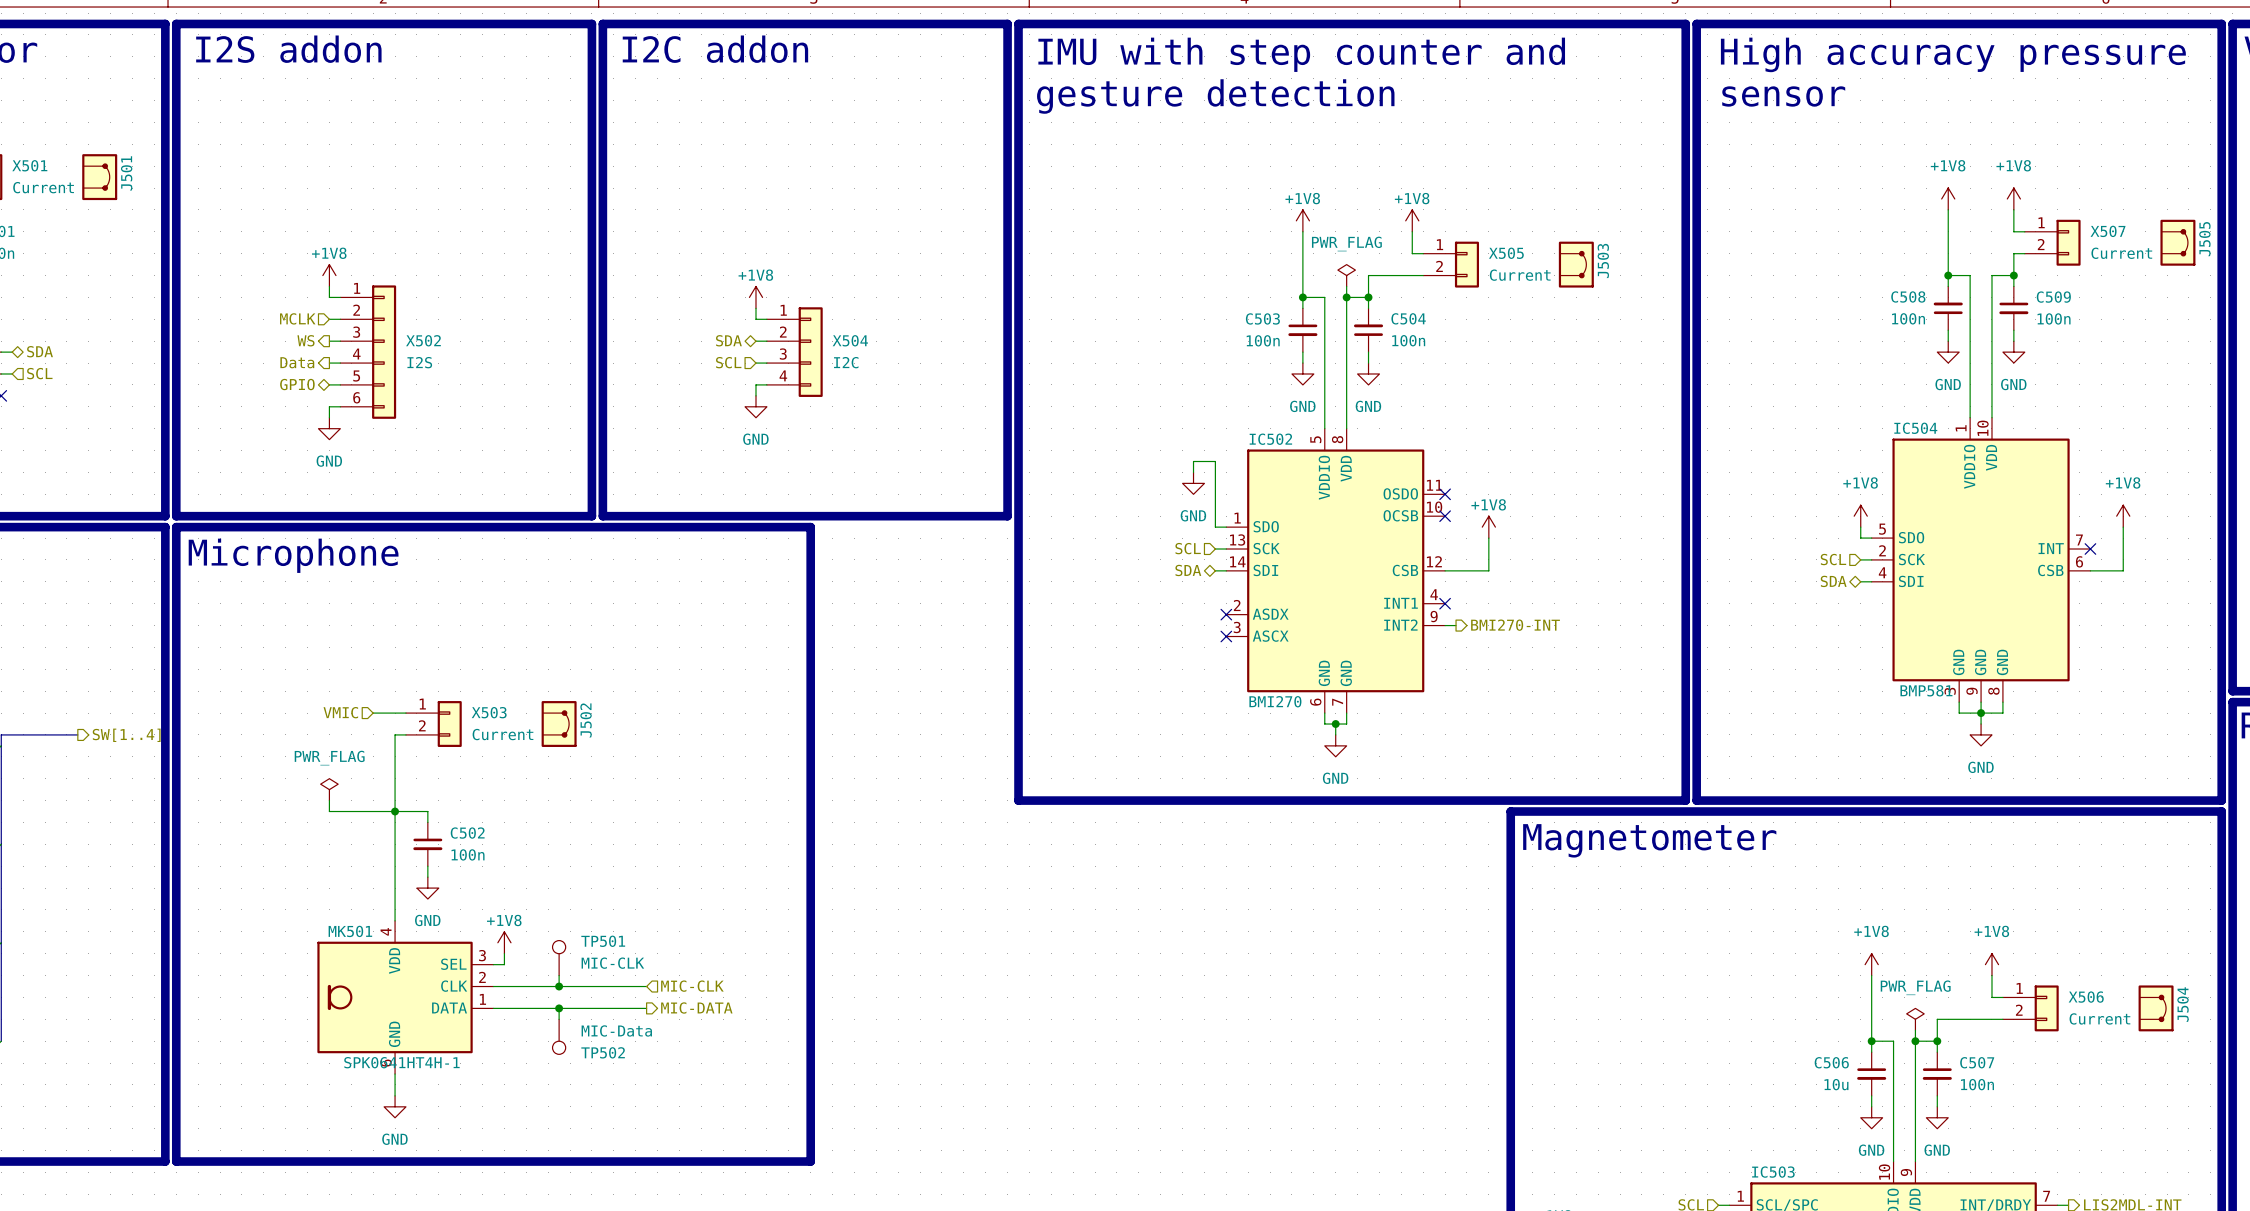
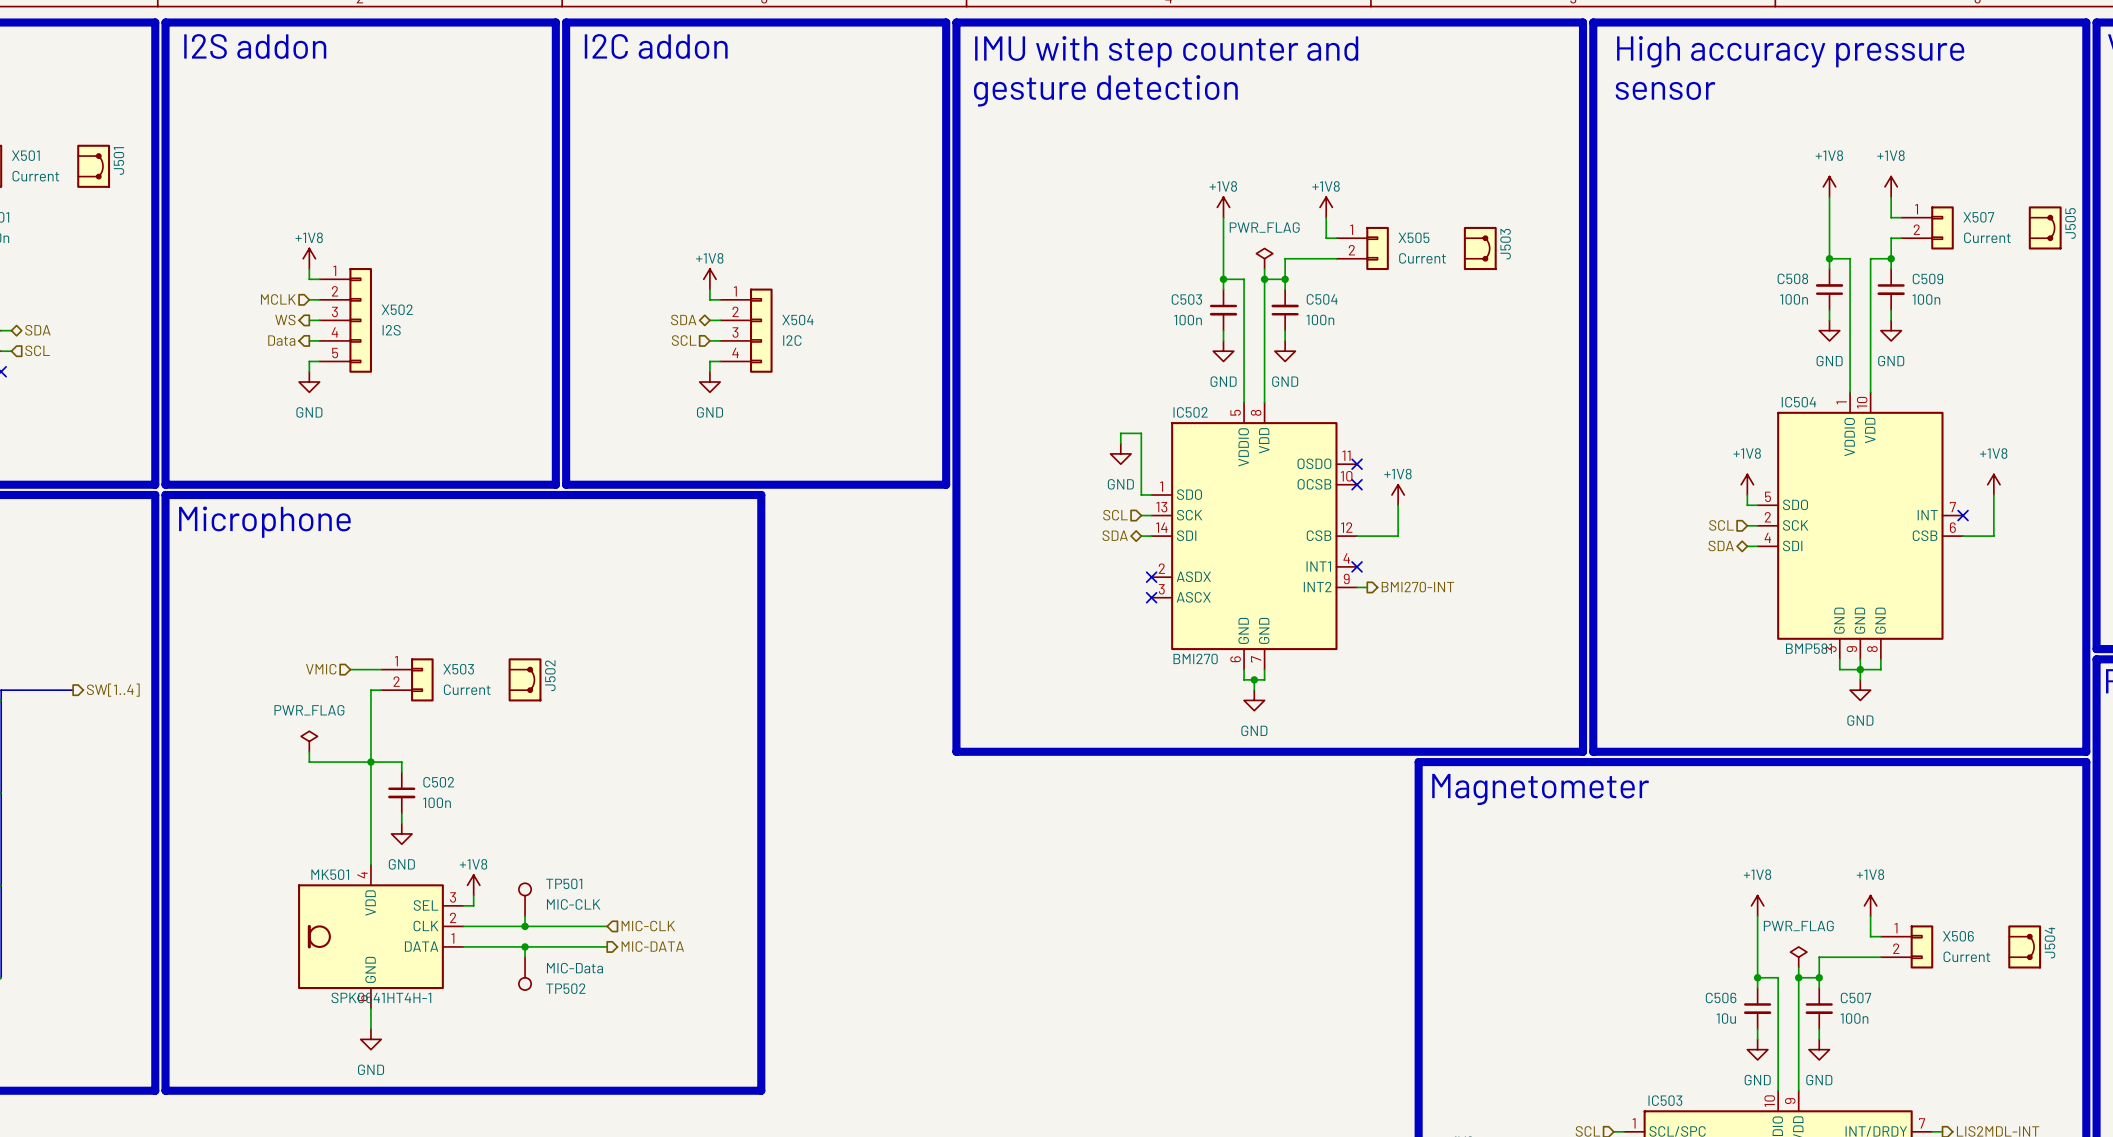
X502 symbol: [340, 285, 397, 419] -> [319, 268, 372, 373]
hierarchical label: GPIO (297, 384) -> none
wire: none -> (309, 361) (309, 371)
power symbol position: GND (329, 428) -> GND (309, 382)

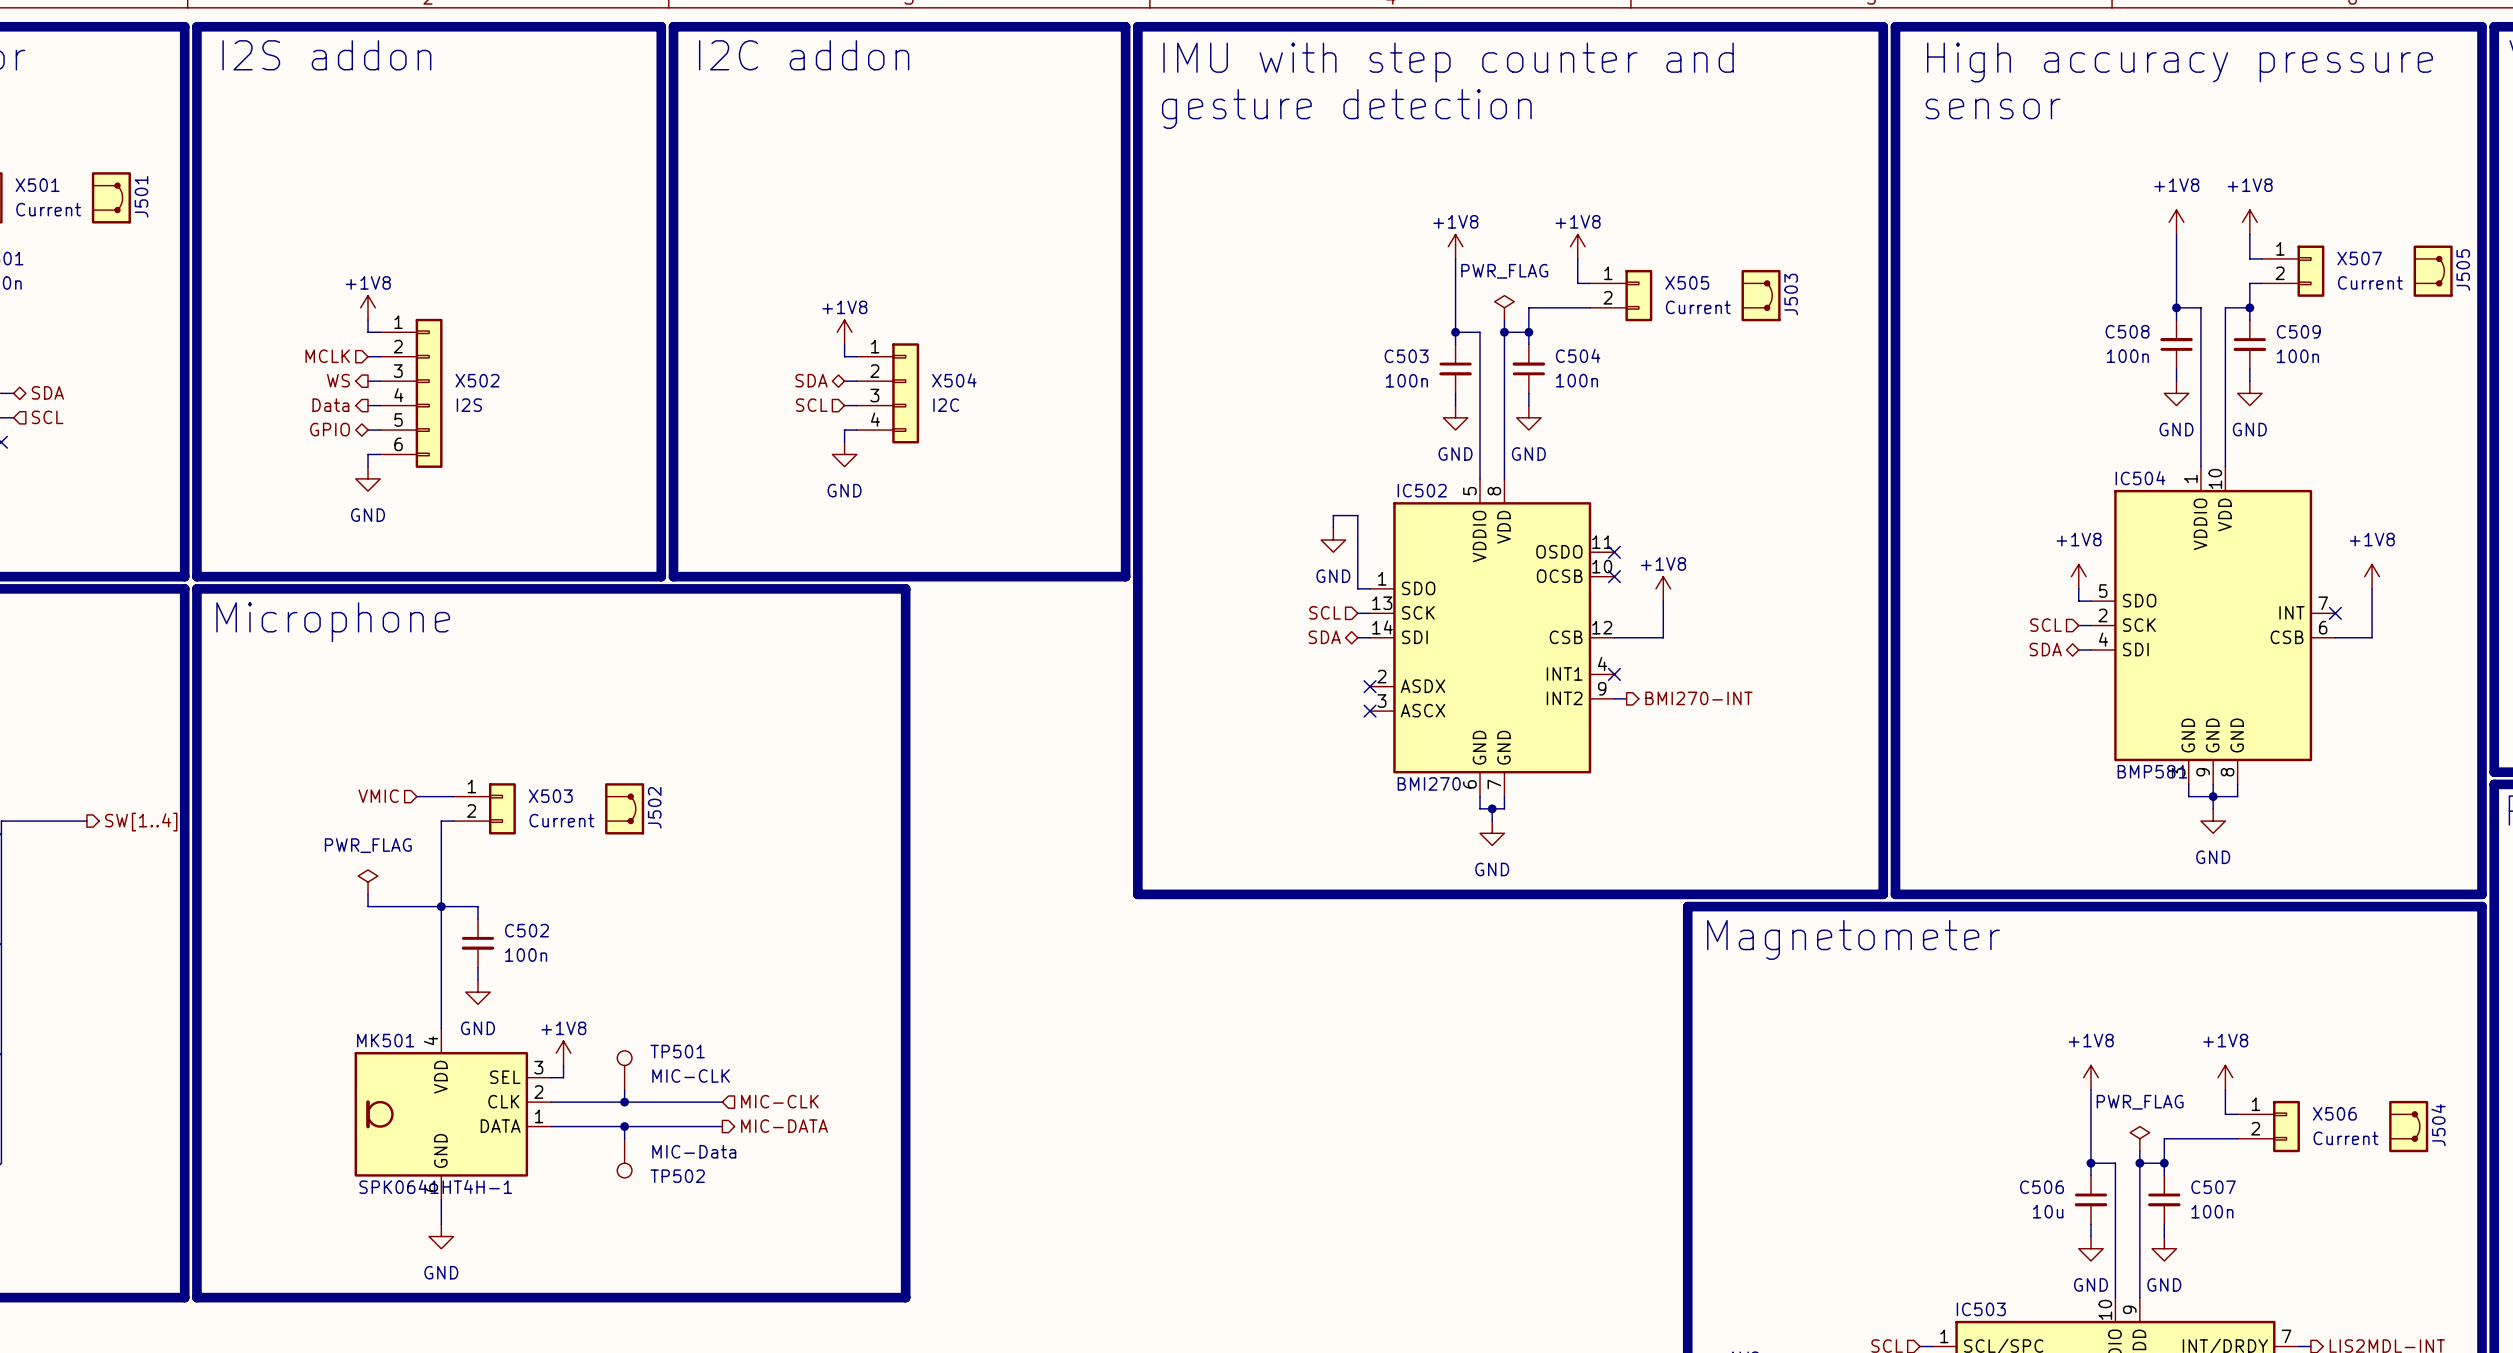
X502 symbol: [319, 268, 372, 373] -> [380, 318, 443, 468]
hierarchical label: none -> GPIO (329, 429)
wire: (309, 361) (309, 371) -> none
power symbol position: GND (309, 382) -> GND (368, 478)

